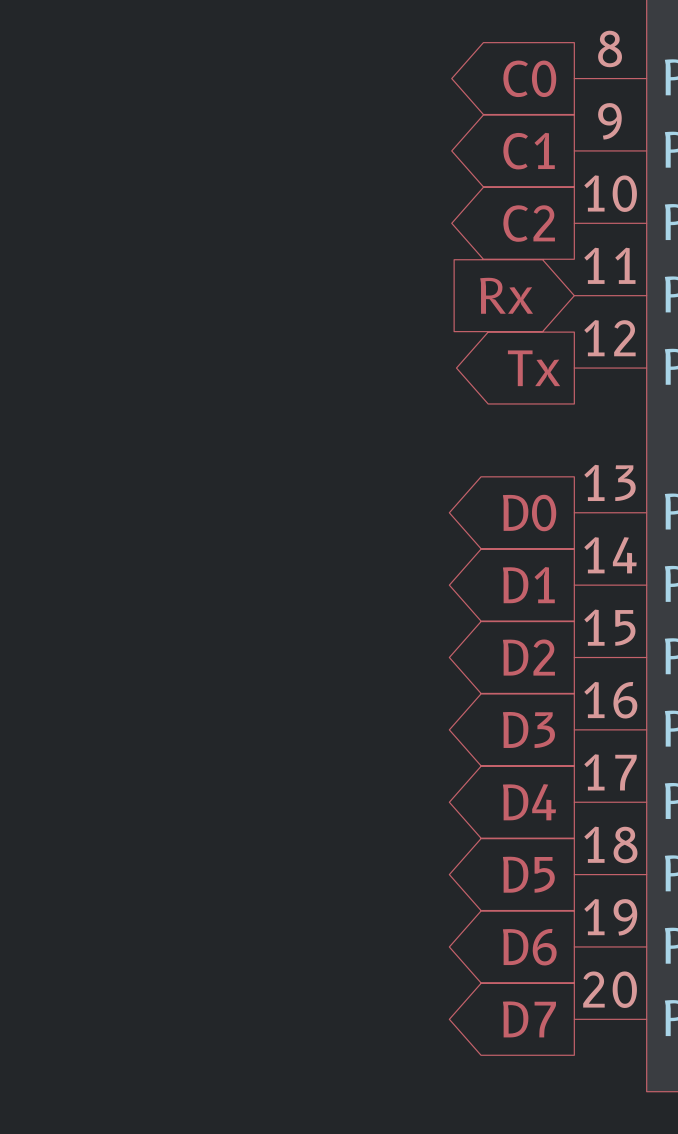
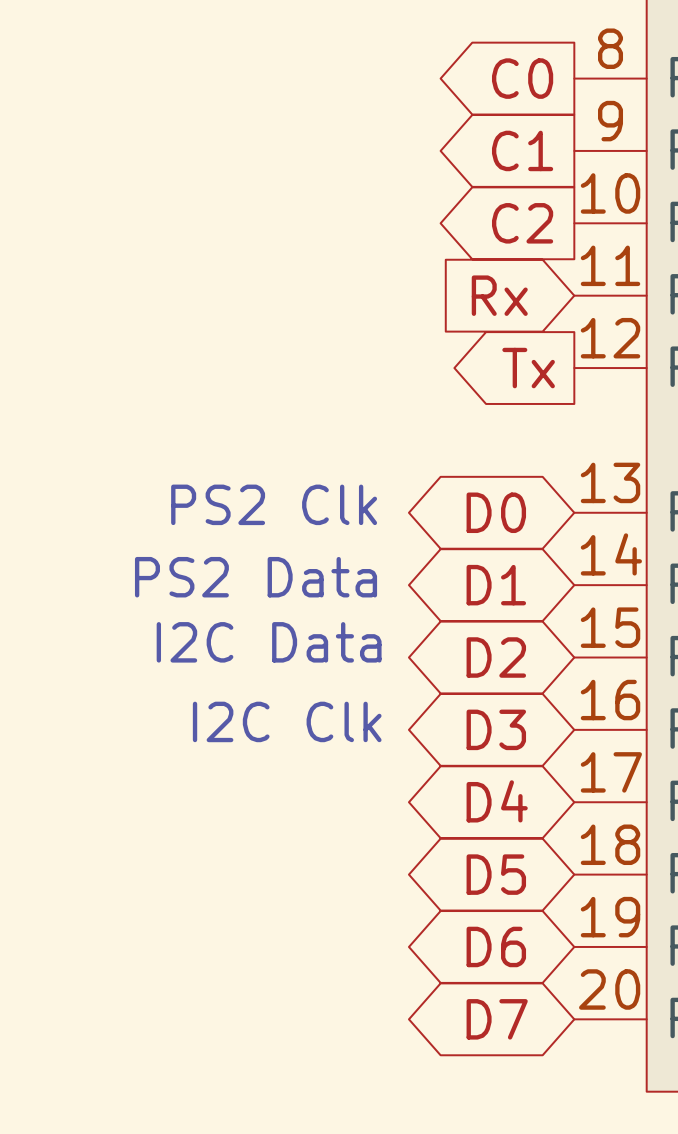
text: none -> PS2 Clk (274, 504)
global label shape: output (529, 513) -> bidirectional (496, 512)
text: none -> PS2 Data (256, 577)
global label shape: output (528, 585) -> bidirectional (496, 585)
text: none -> I2C Data (269, 642)
global label shape: output (528, 657) -> bidirectional (496, 657)
text: none -> I2C Clk (287, 721)
global label shape: output (528, 729) -> bidirectional (496, 729)
global label shape: output (529, 802) -> bidirectional (497, 801)
global label shape: output (528, 874) -> bidirectional (496, 874)
global label shape: output (529, 947) -> bidirectional (496, 946)
global label shape: output (529, 1019) -> bidirectional (497, 1019)

